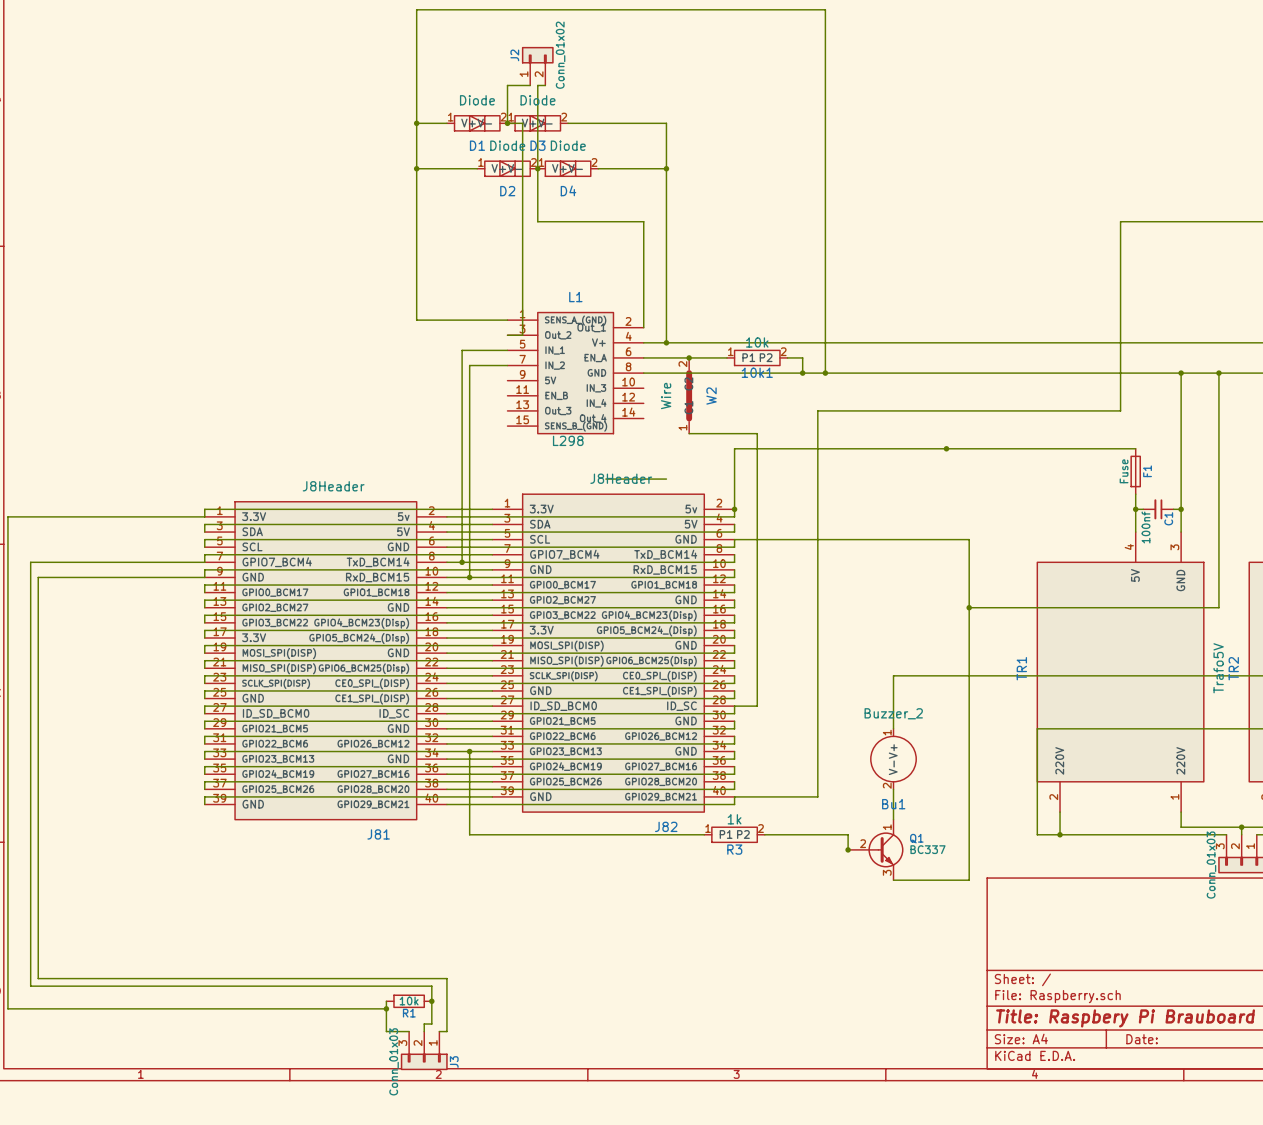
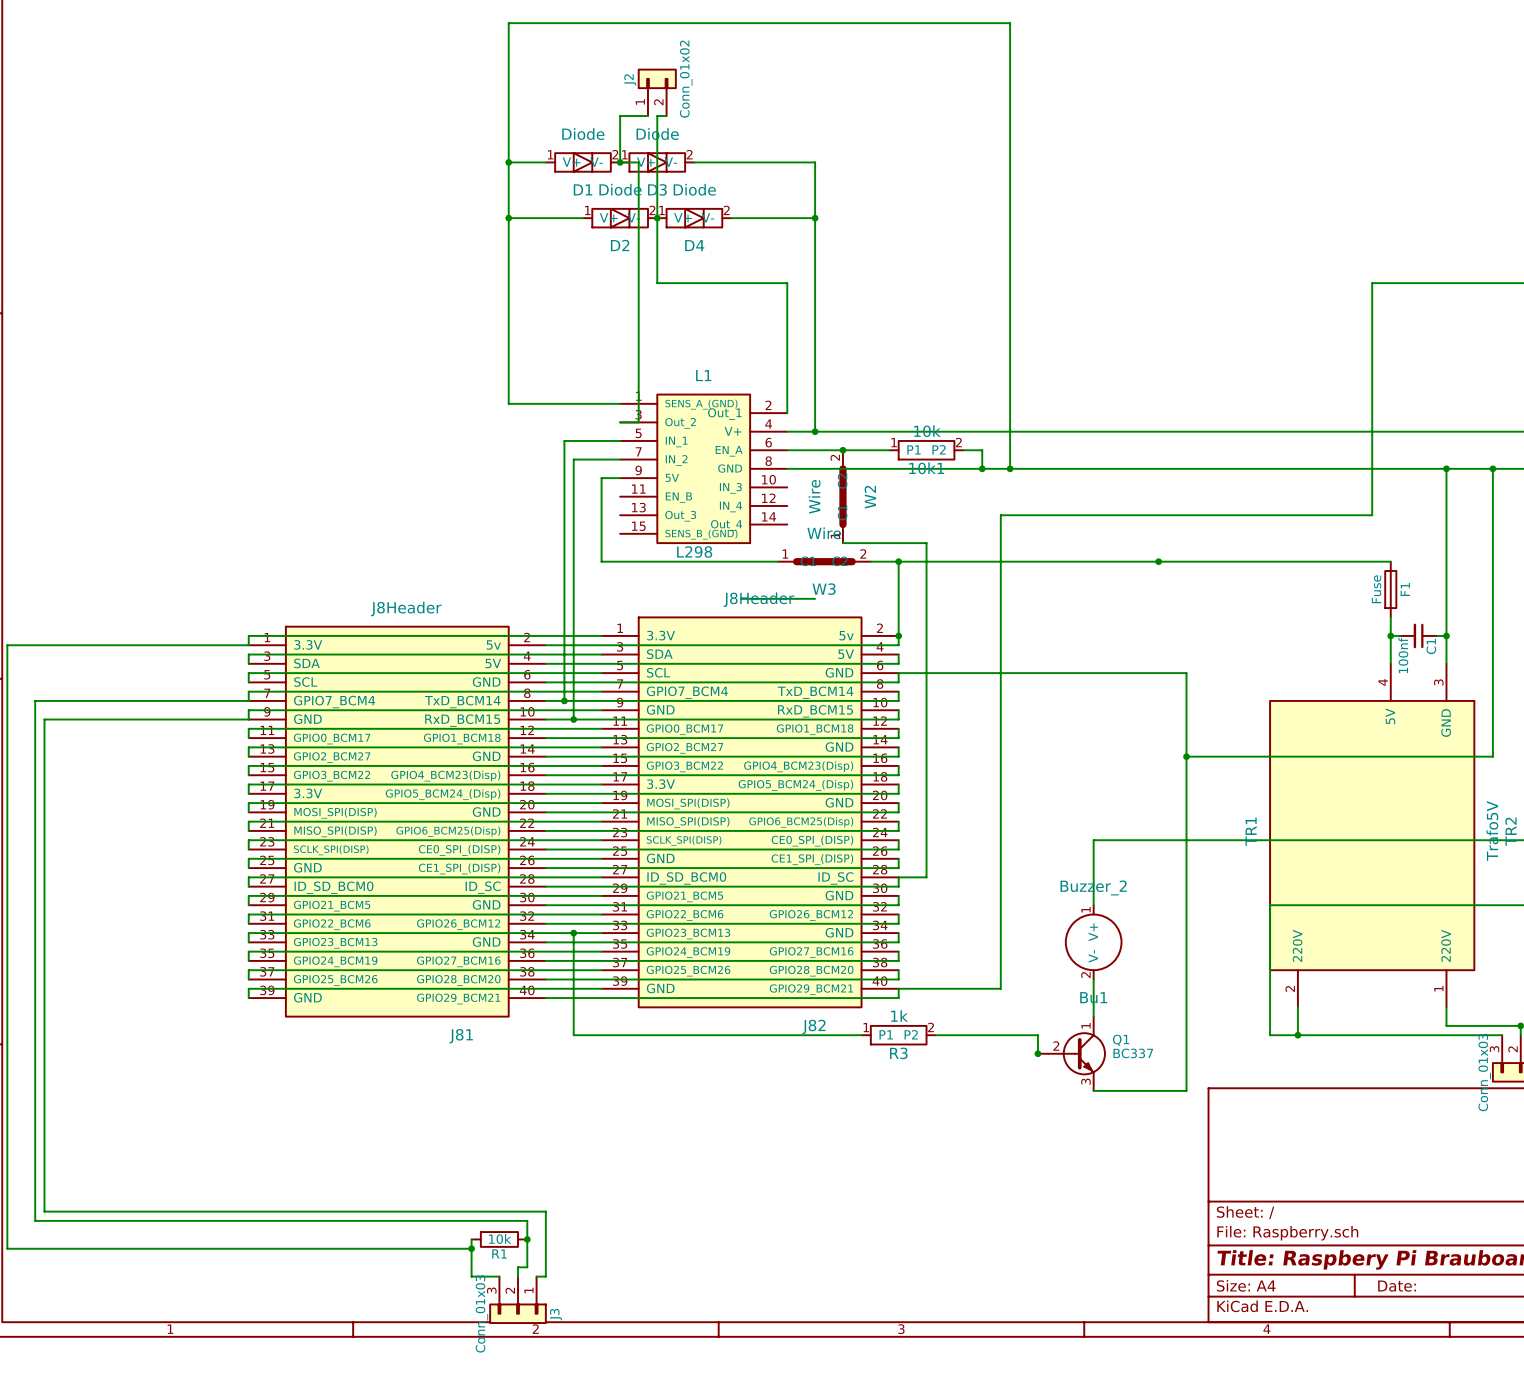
wire: none -> (620, 478) (601, 478) (601, 561) (777, 561)
W3: none -> Wire (824, 561)
wire: none -> (870, 561) (898, 561)
junction: none -> (898, 561)

